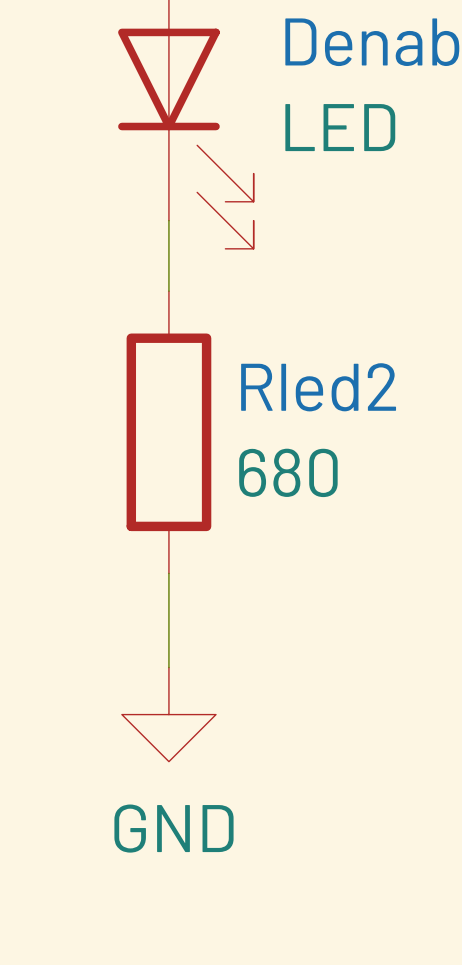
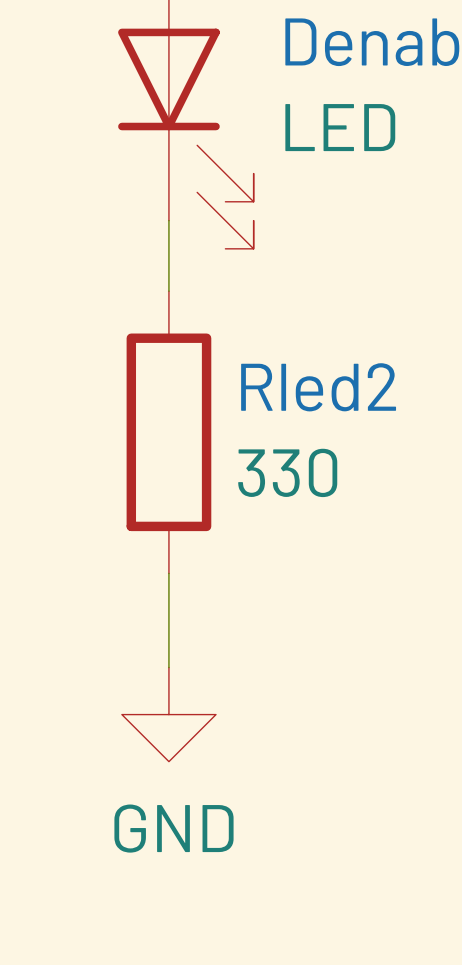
Rled2 value: 680 (288, 472) -> 330 (287, 472)

